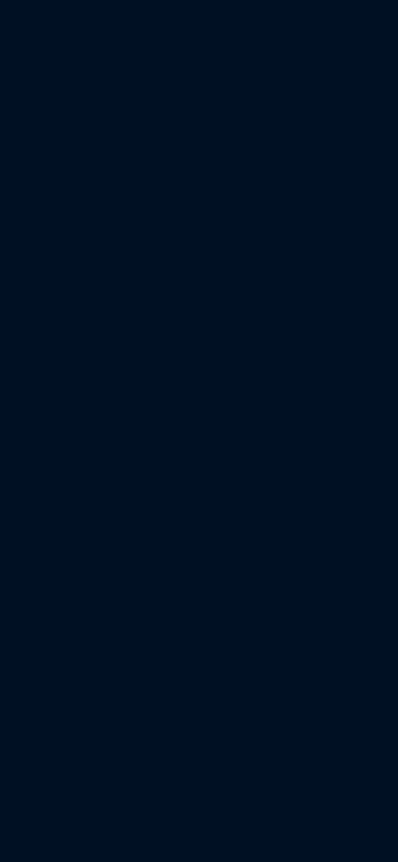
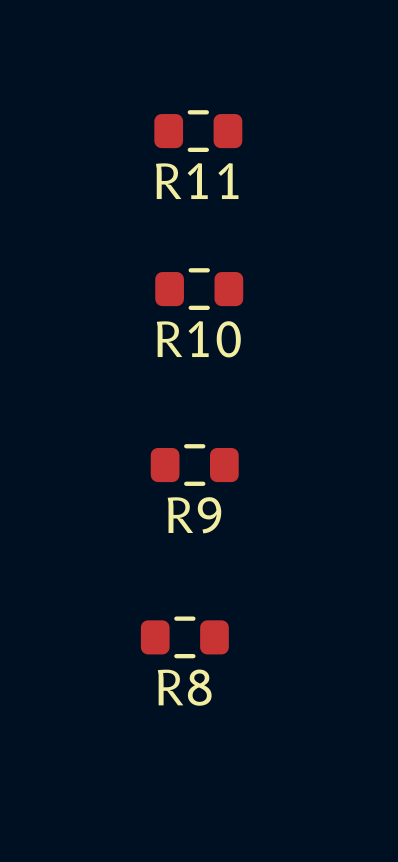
R11: none -> (198, 131)
R10: none -> (199, 289)
R9: none -> (194, 465)
R8: none -> (184, 637)

